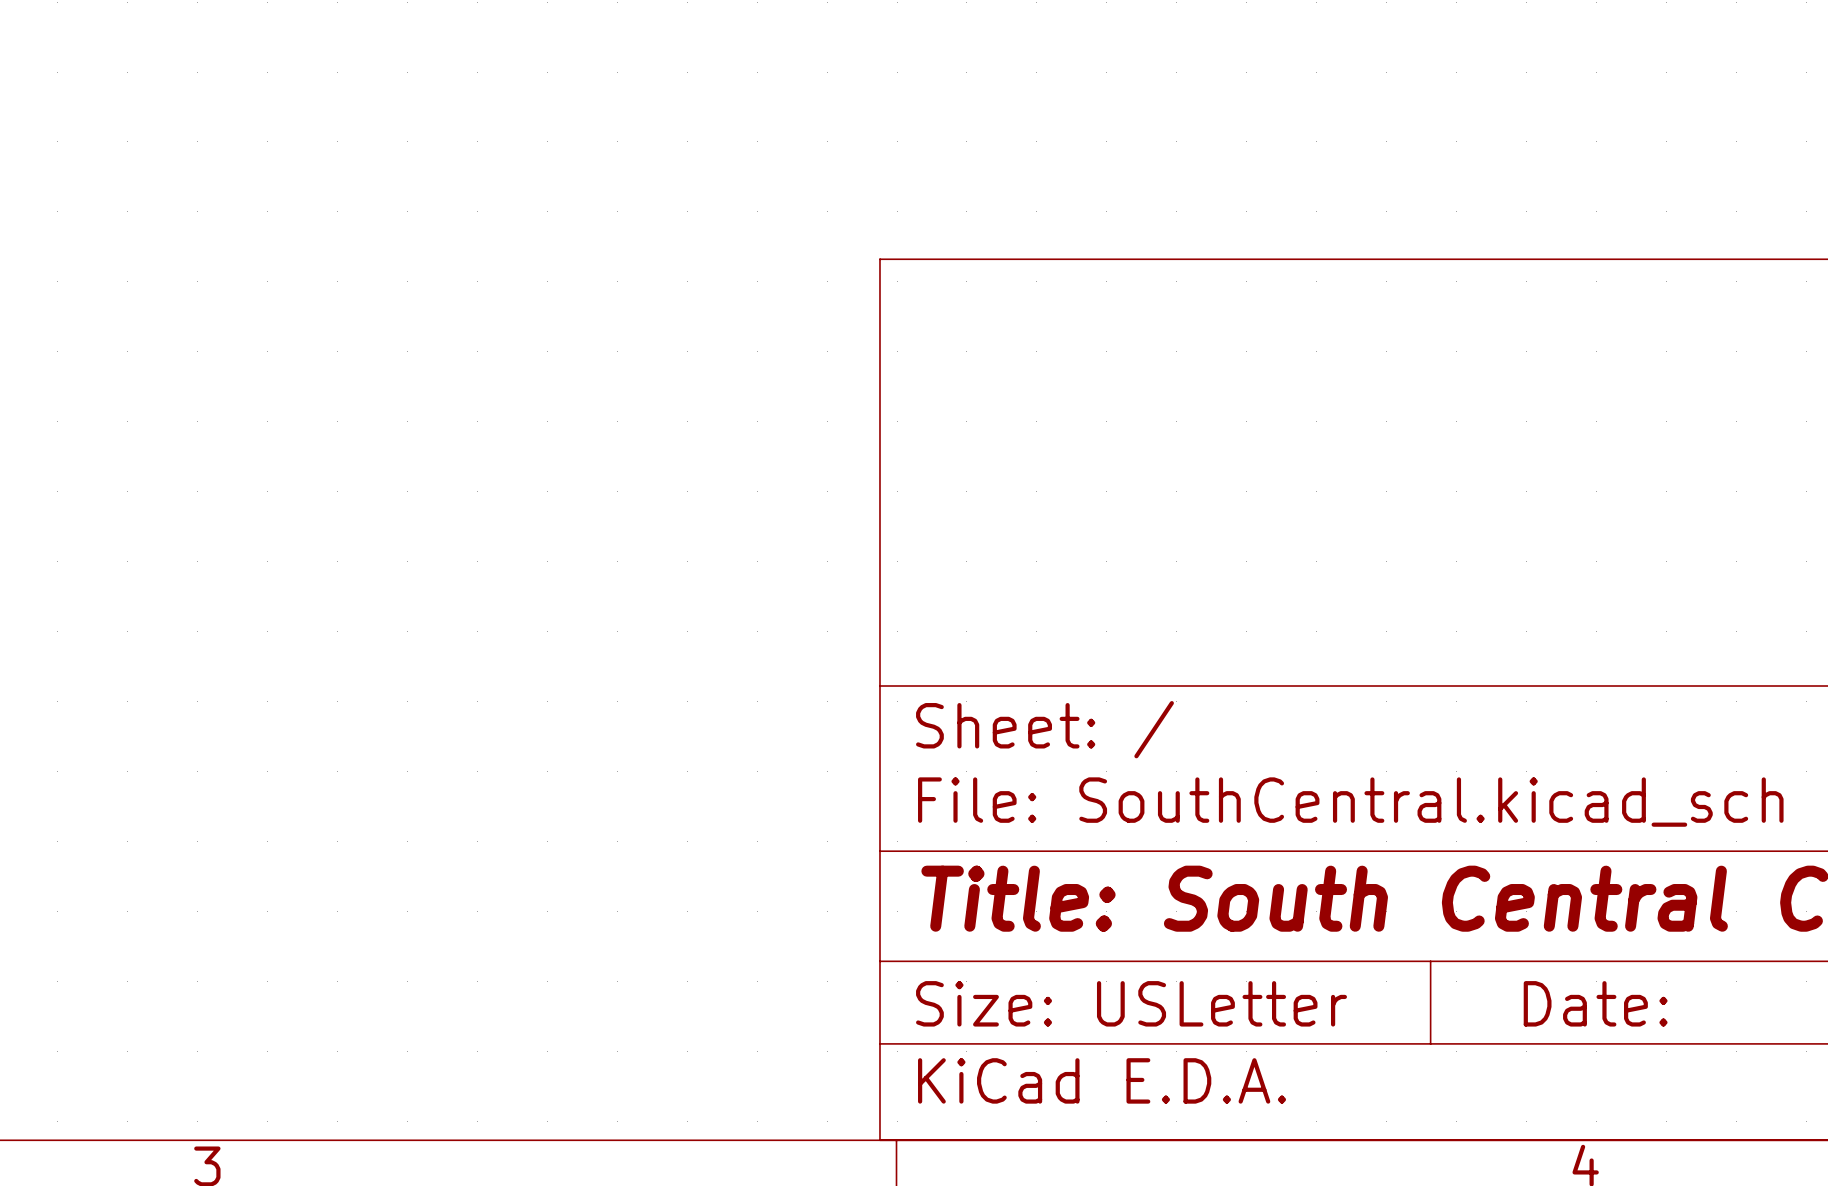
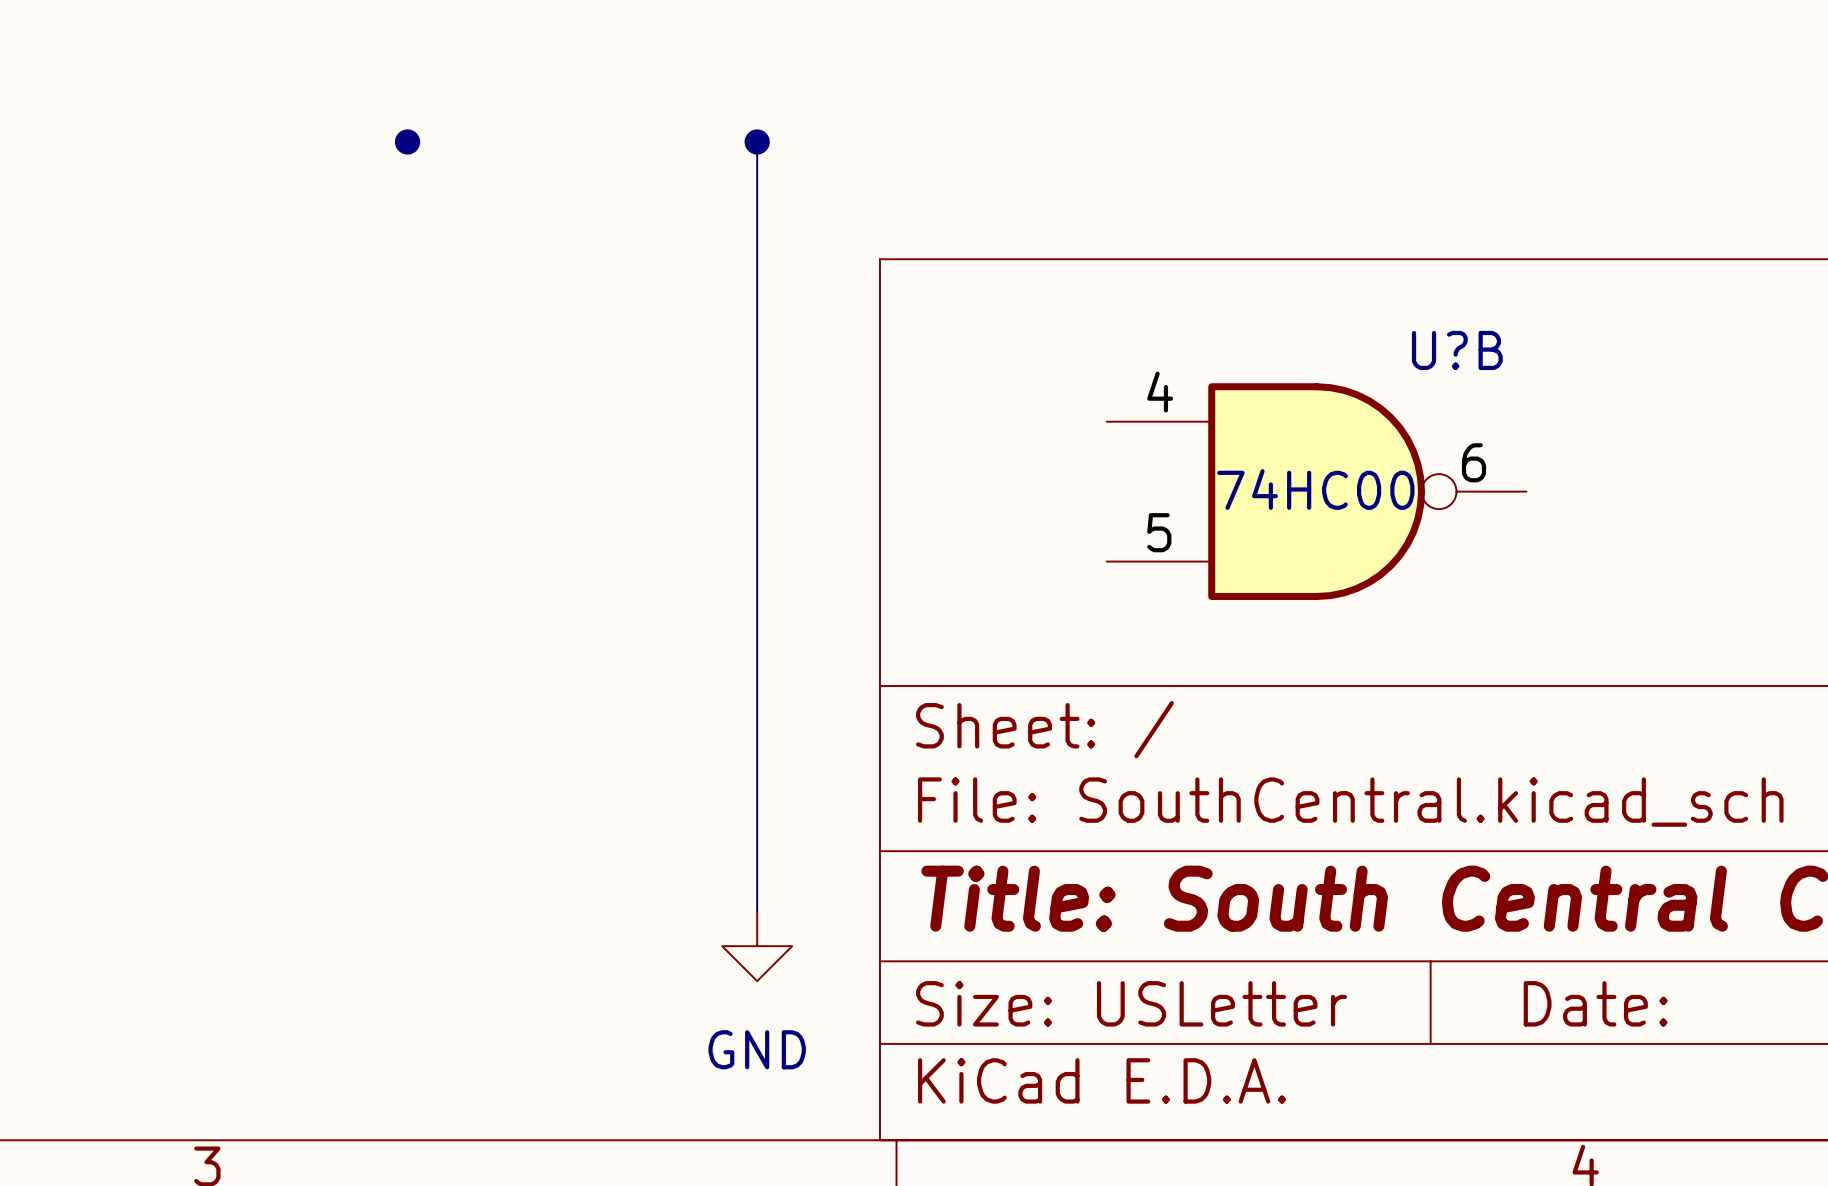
junction: none -> (407, 141)
wire: none -> (757, 141) (757, 911)
junction: none -> (757, 141)
U?B: none -> 74HC00 (1316, 491)
power symbol: none -> GND (757, 946)

